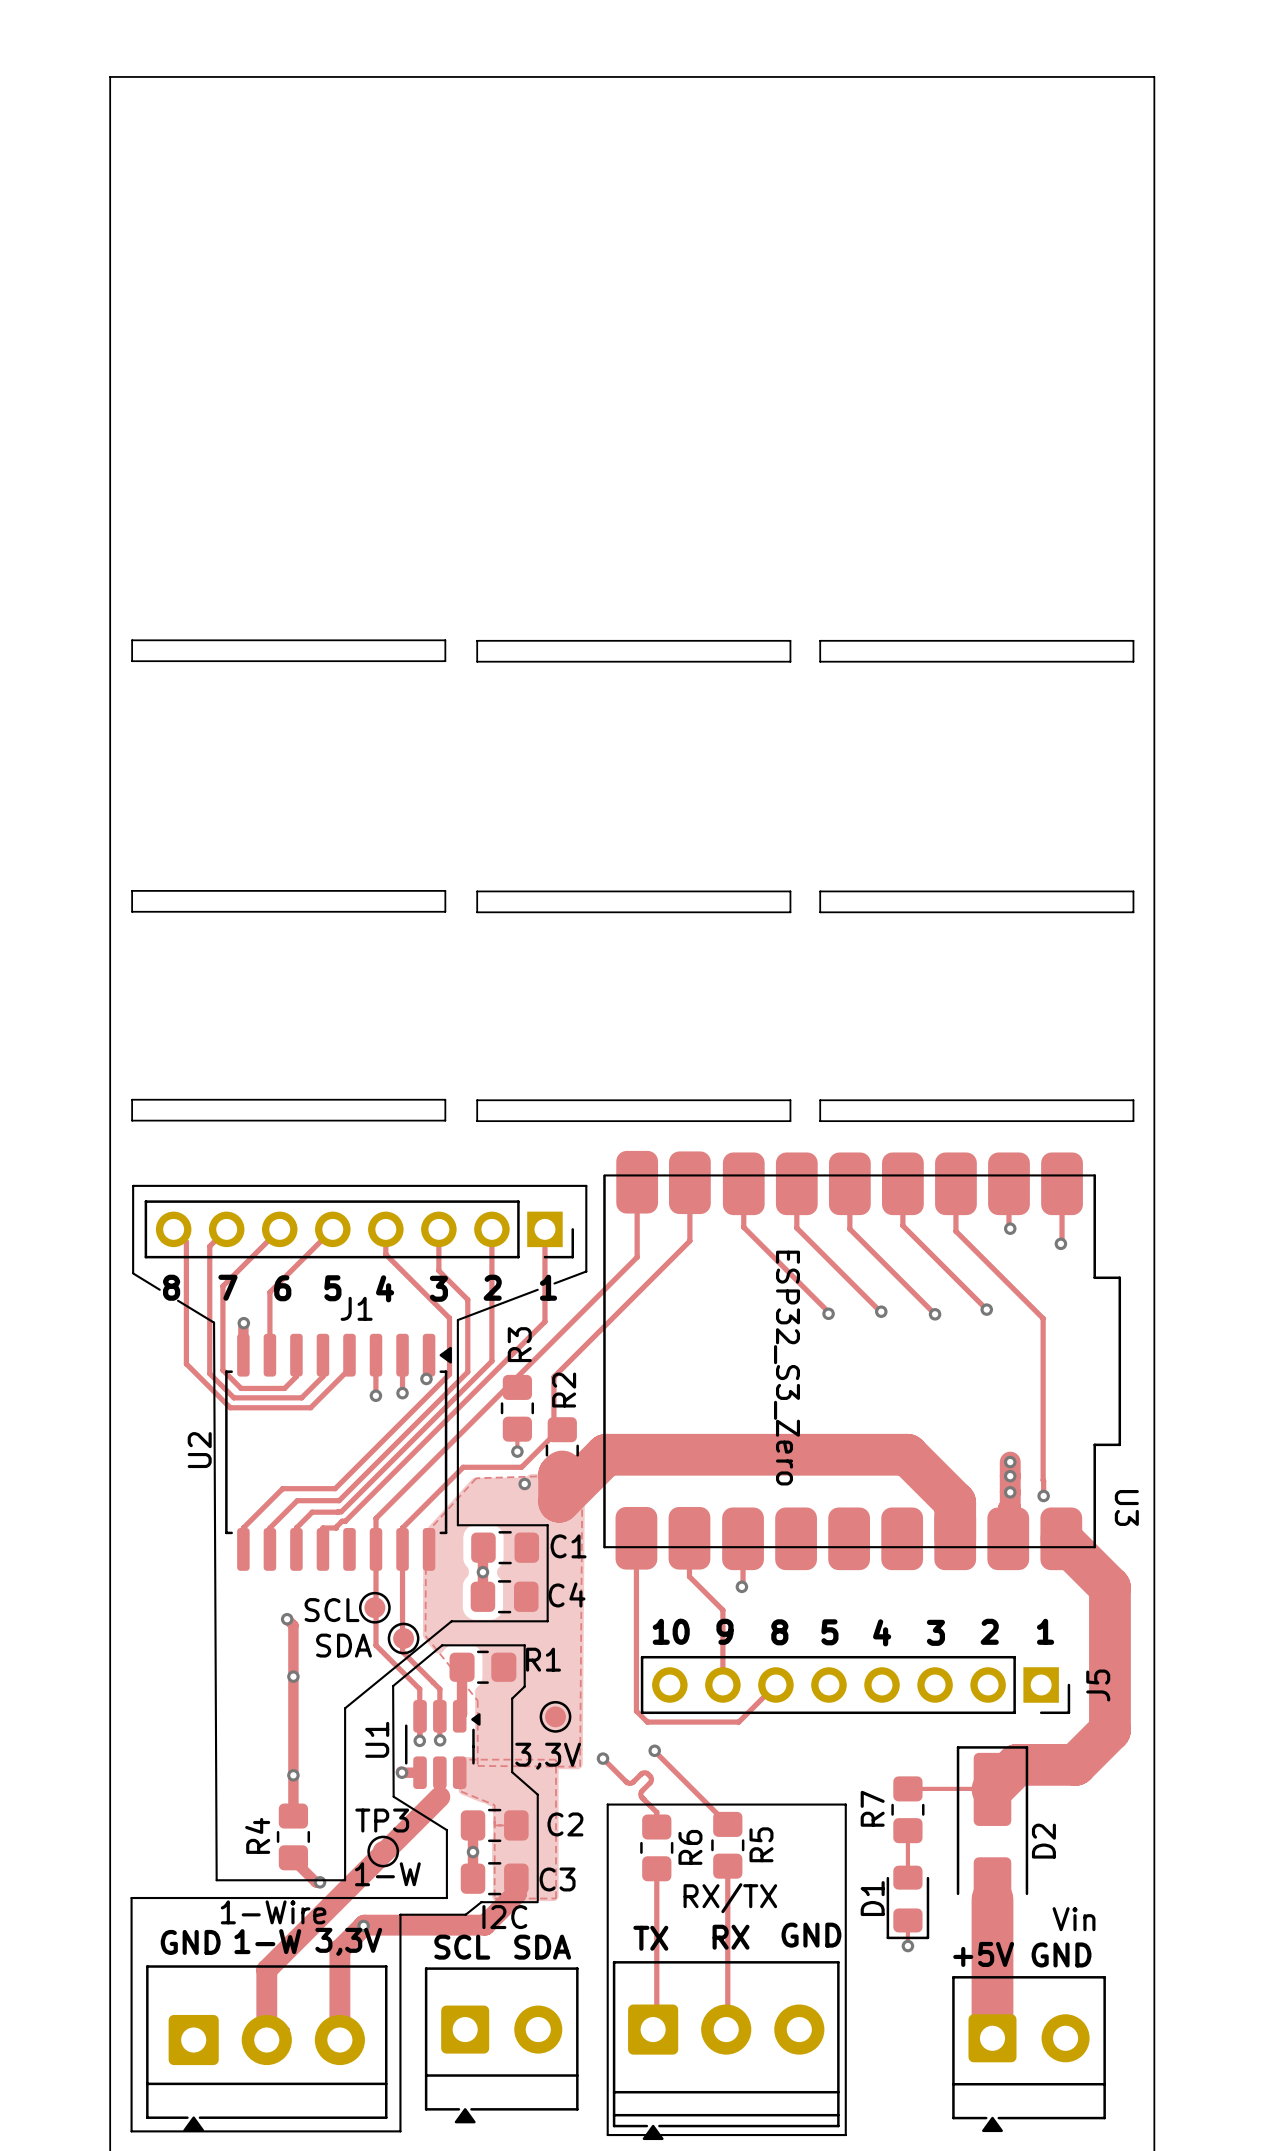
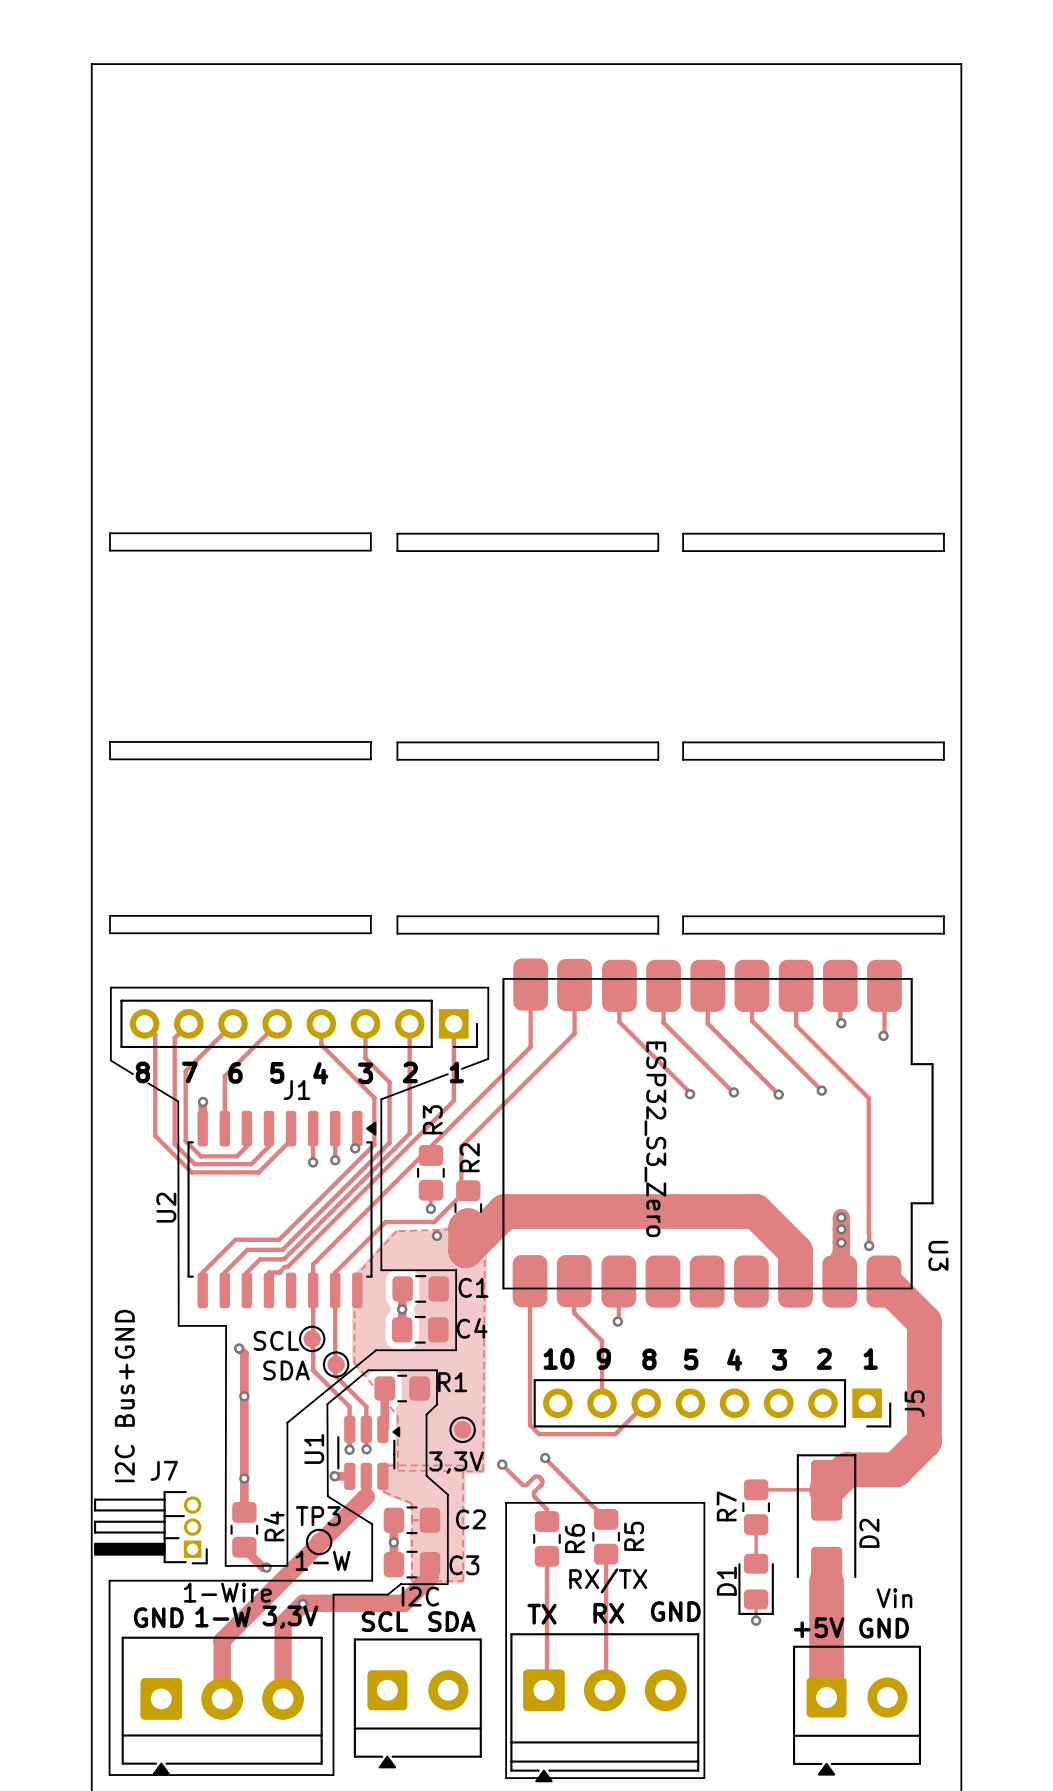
line: (214, 1322) (216, 1880) (270, 1880) -> (178, 1101) (178, 1325) (226, 1325) (225, 1565)
text: none -> I2C Bus+GND (124, 1396)
J7: none -> (150, 1527)
R4 name position: R4 (257, 1835) -> R4 (274, 1526)

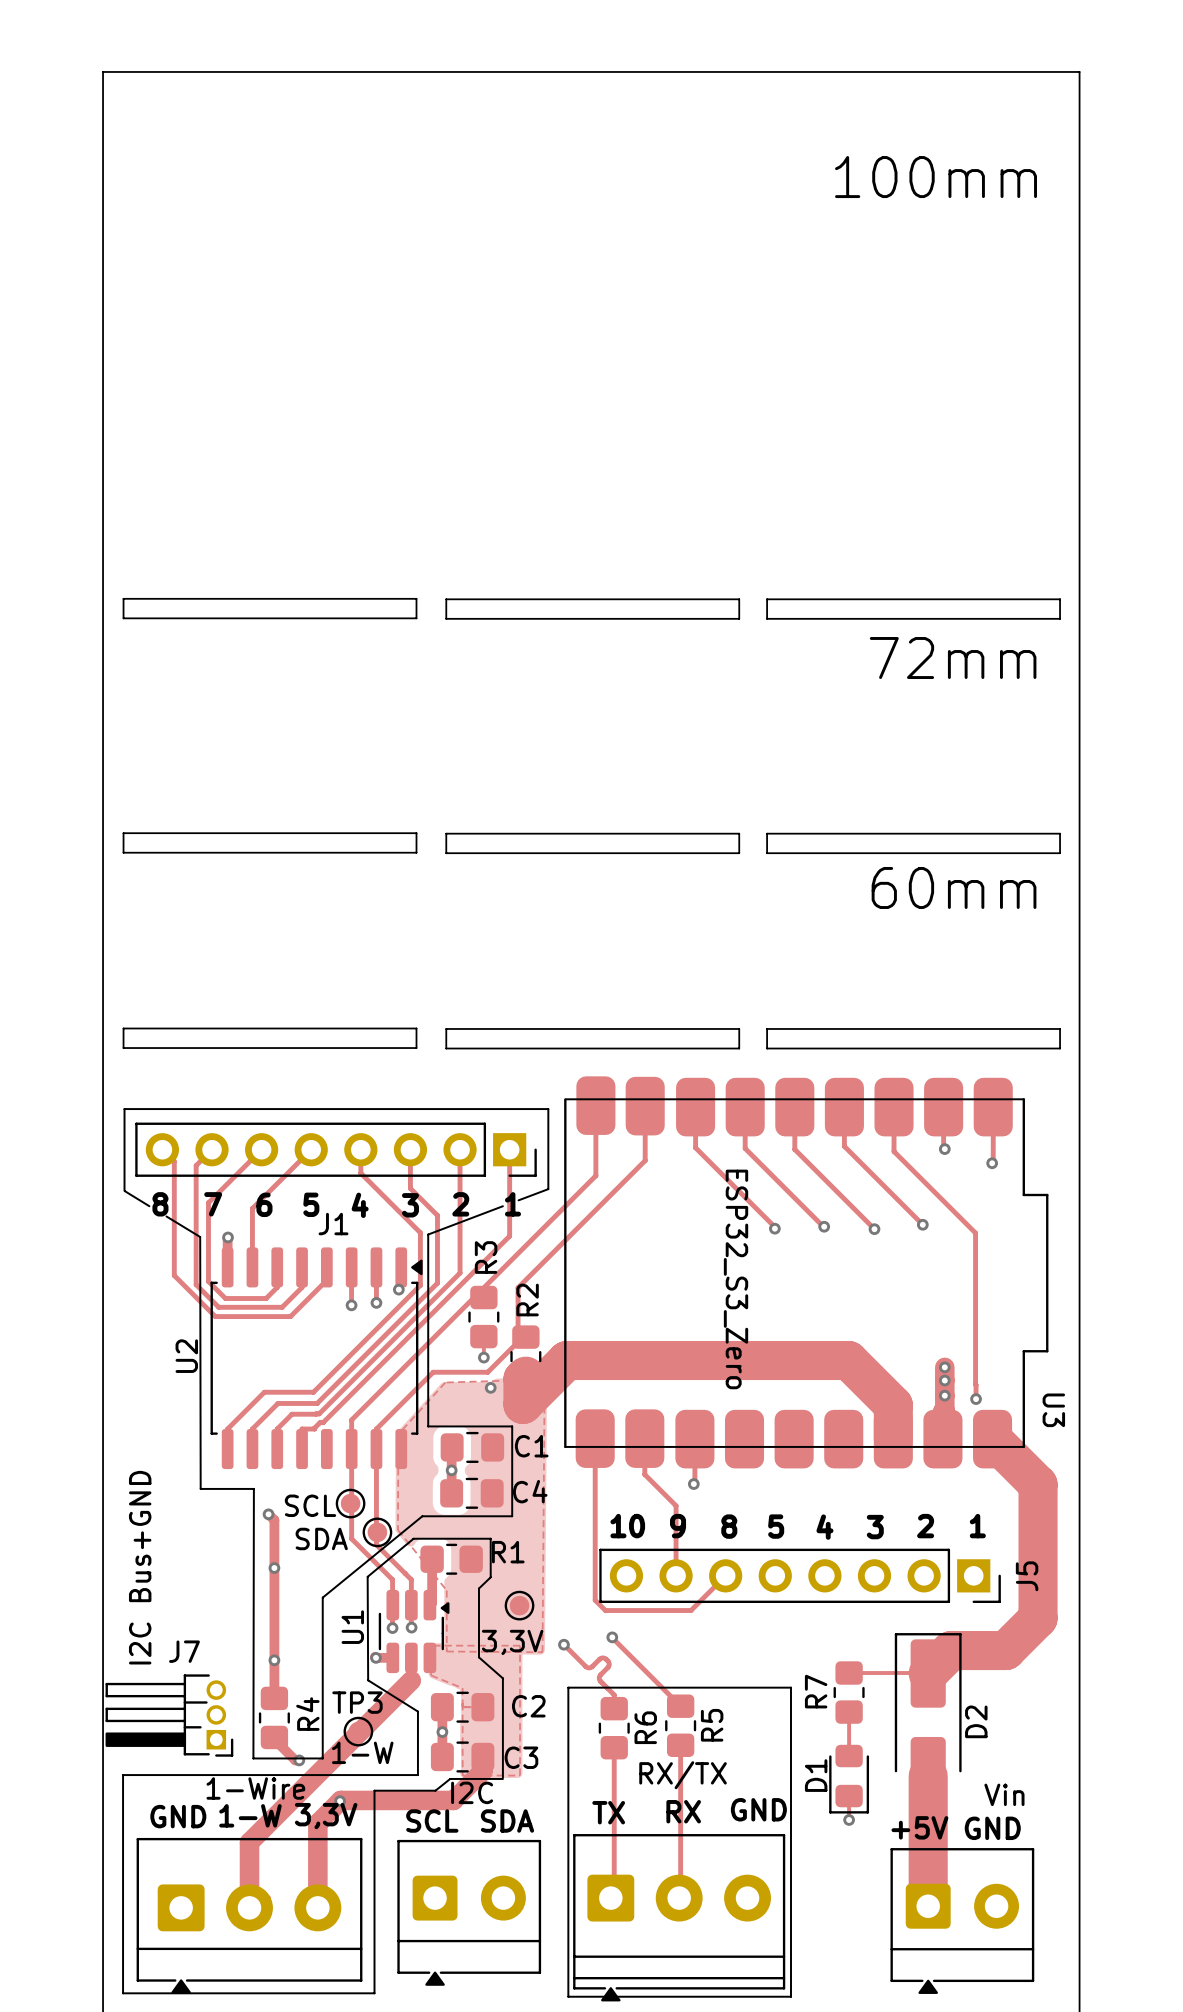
text: none -> 100mm (936, 177)
text: none -> 72mm (953, 658)
text: none -> 60mm (954, 887)

